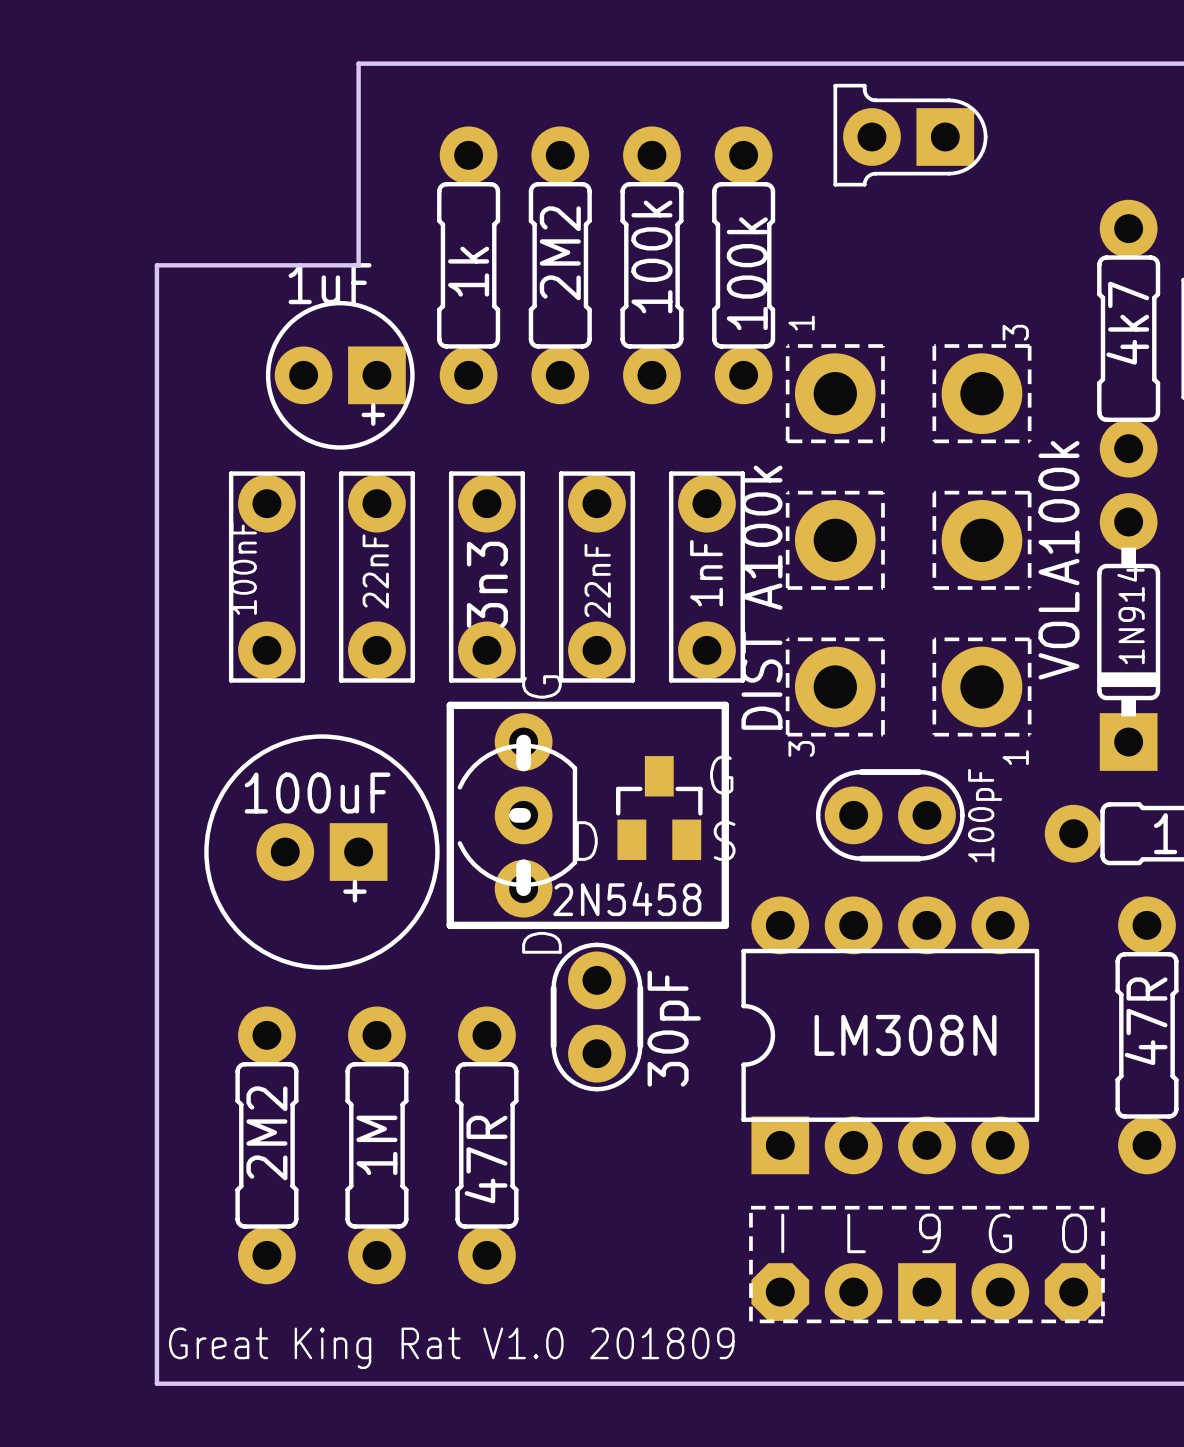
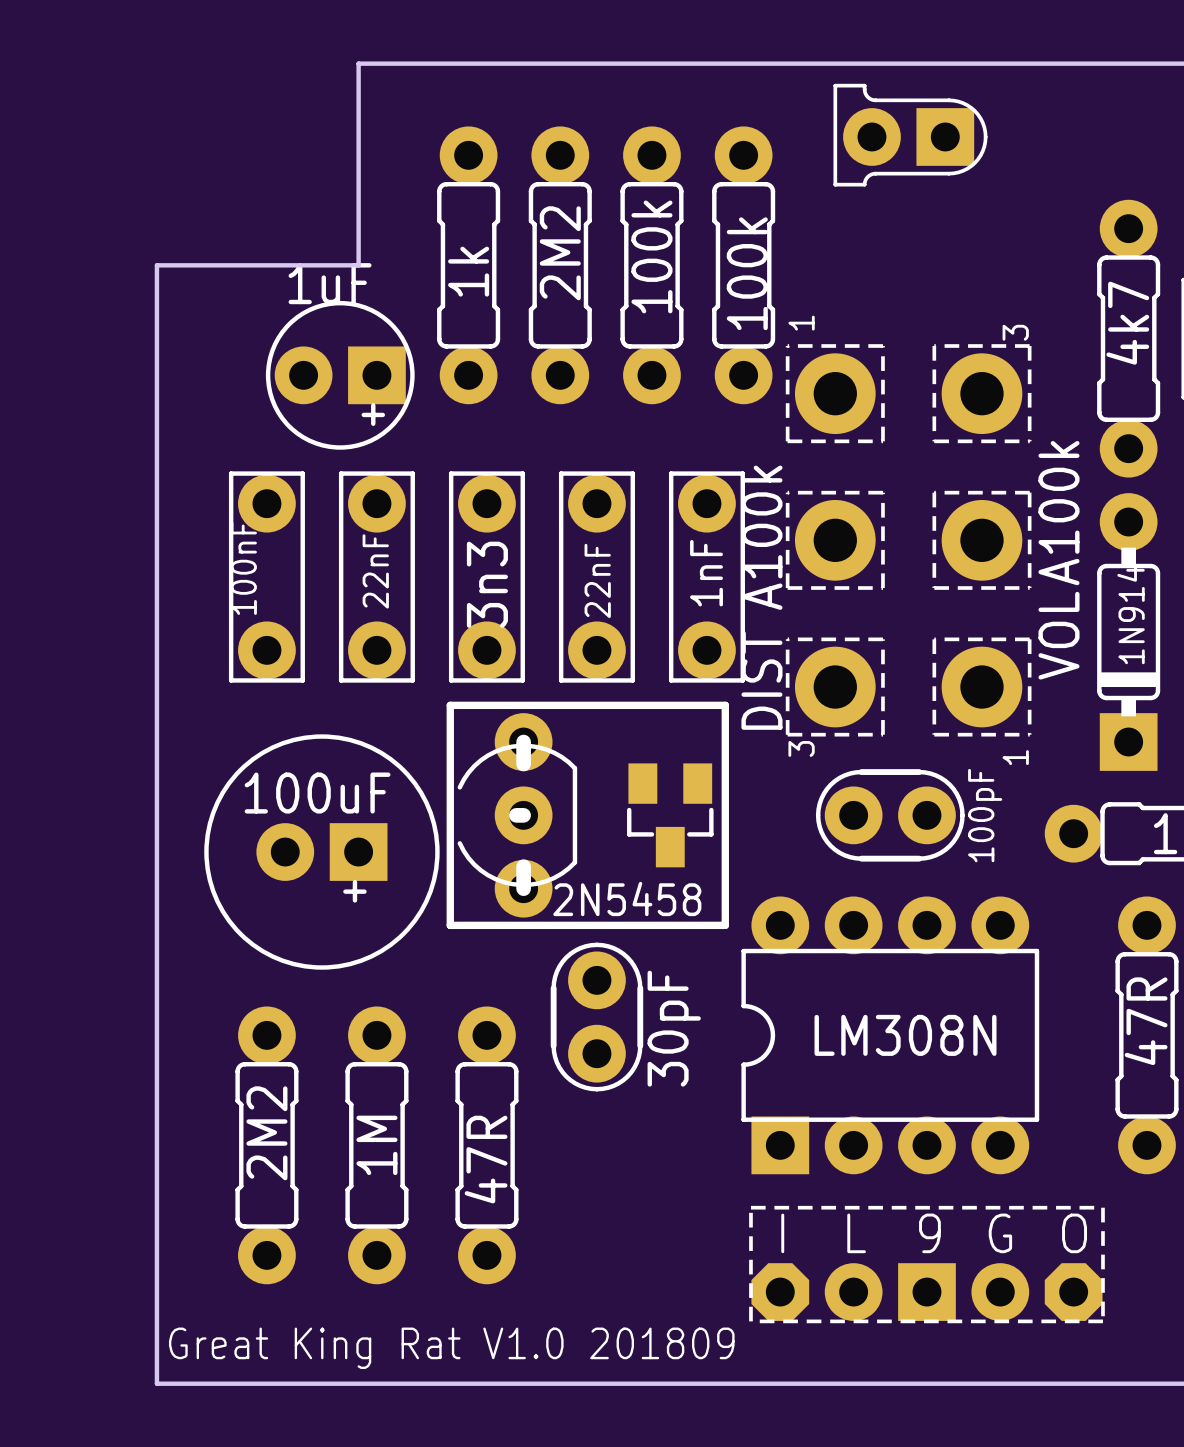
part text: G (541, 686) -> none
part footprint: [616, 756, 703, 861] -> [627, 763, 714, 868]
part text: D (541, 942) -> none

